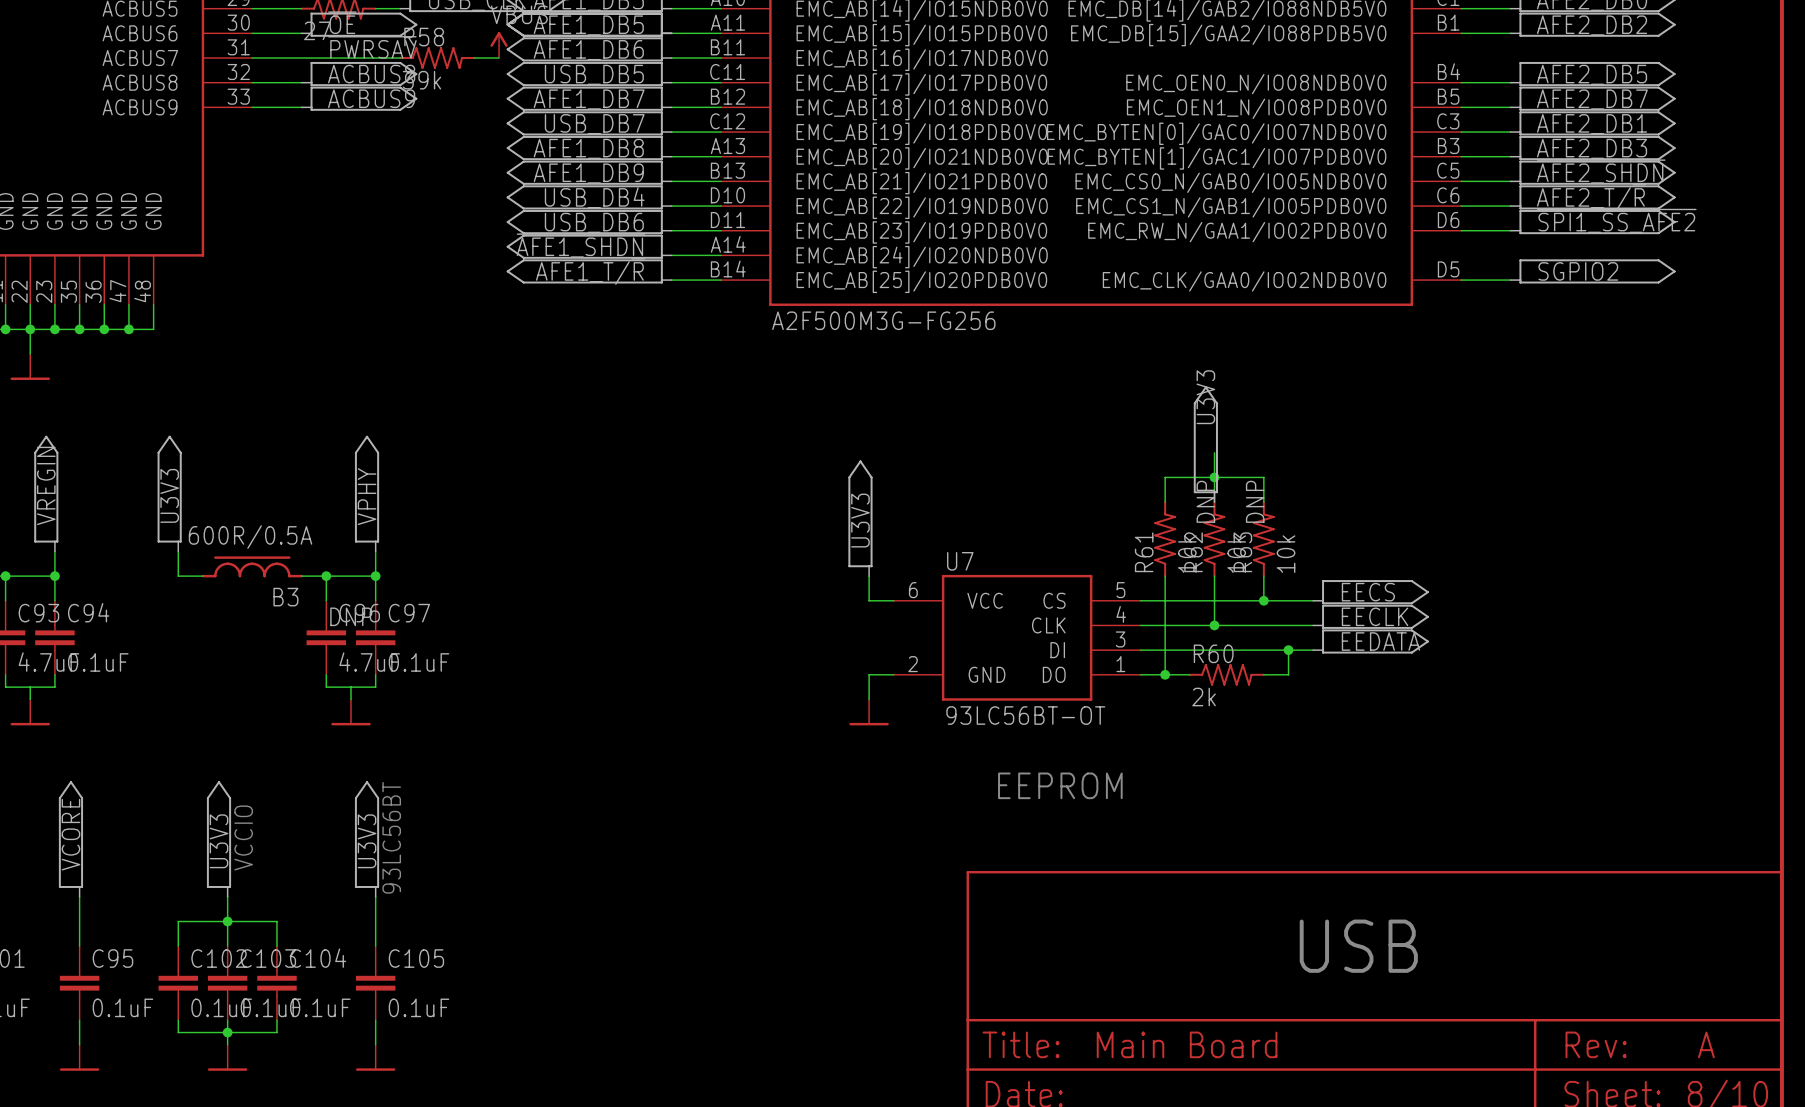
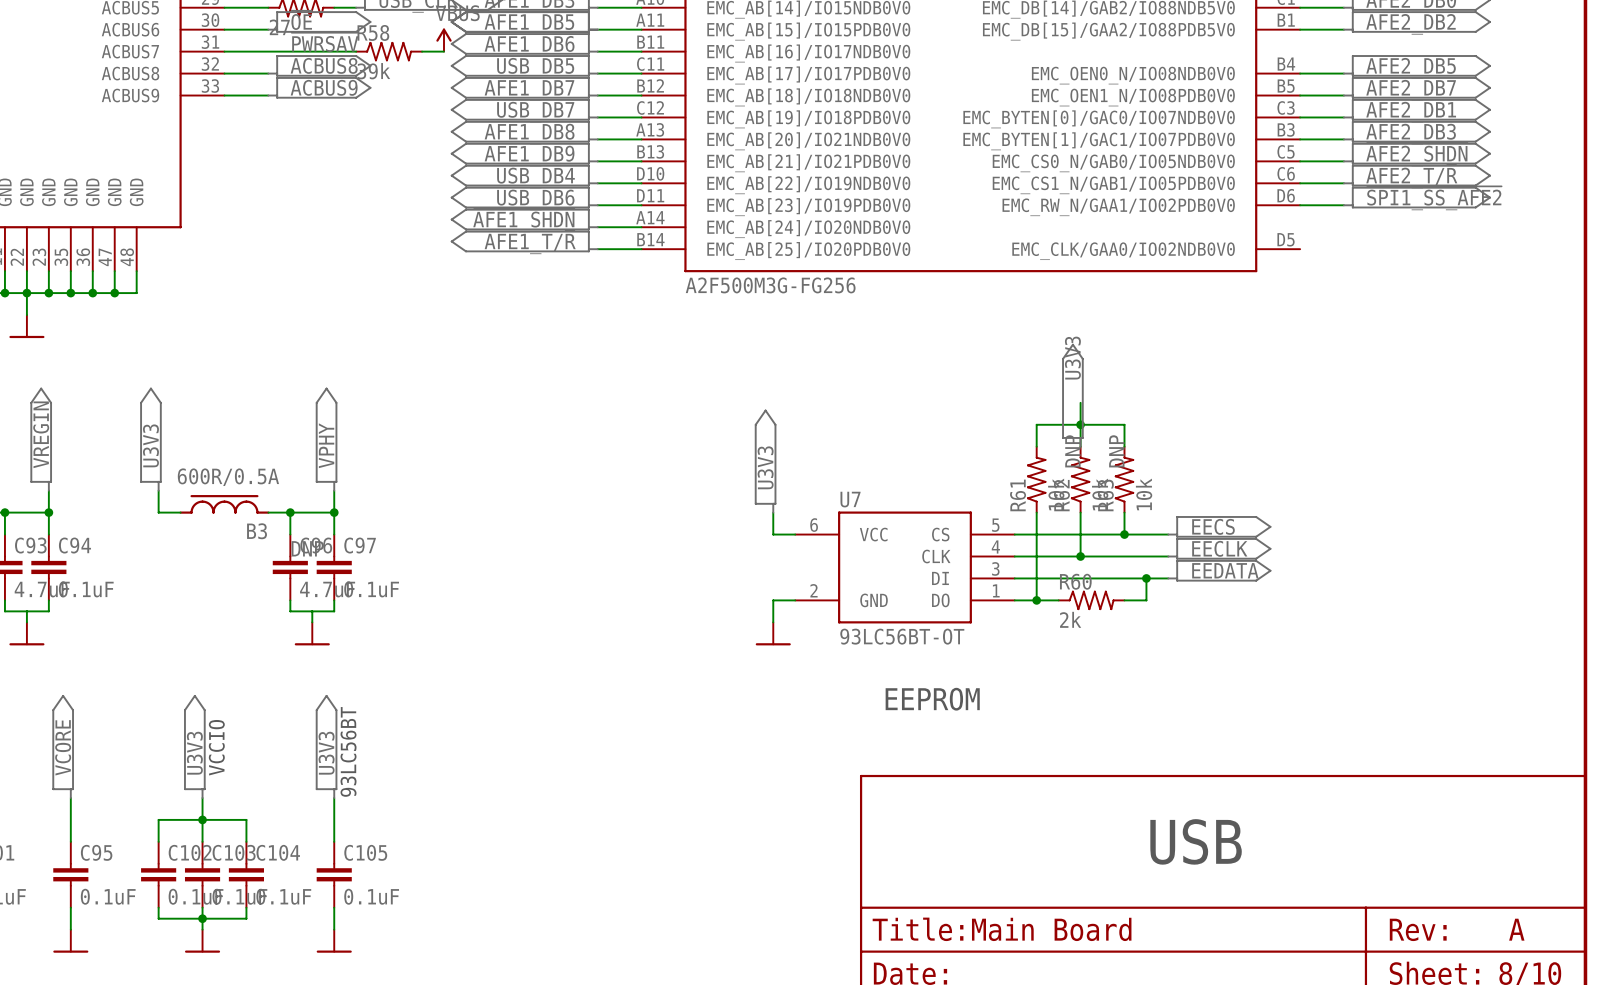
label: SGPIO2 (1578, 271) -> none
part: (1592, 271) -> none
wire: (1461, 280) (1510, 280) -> none

